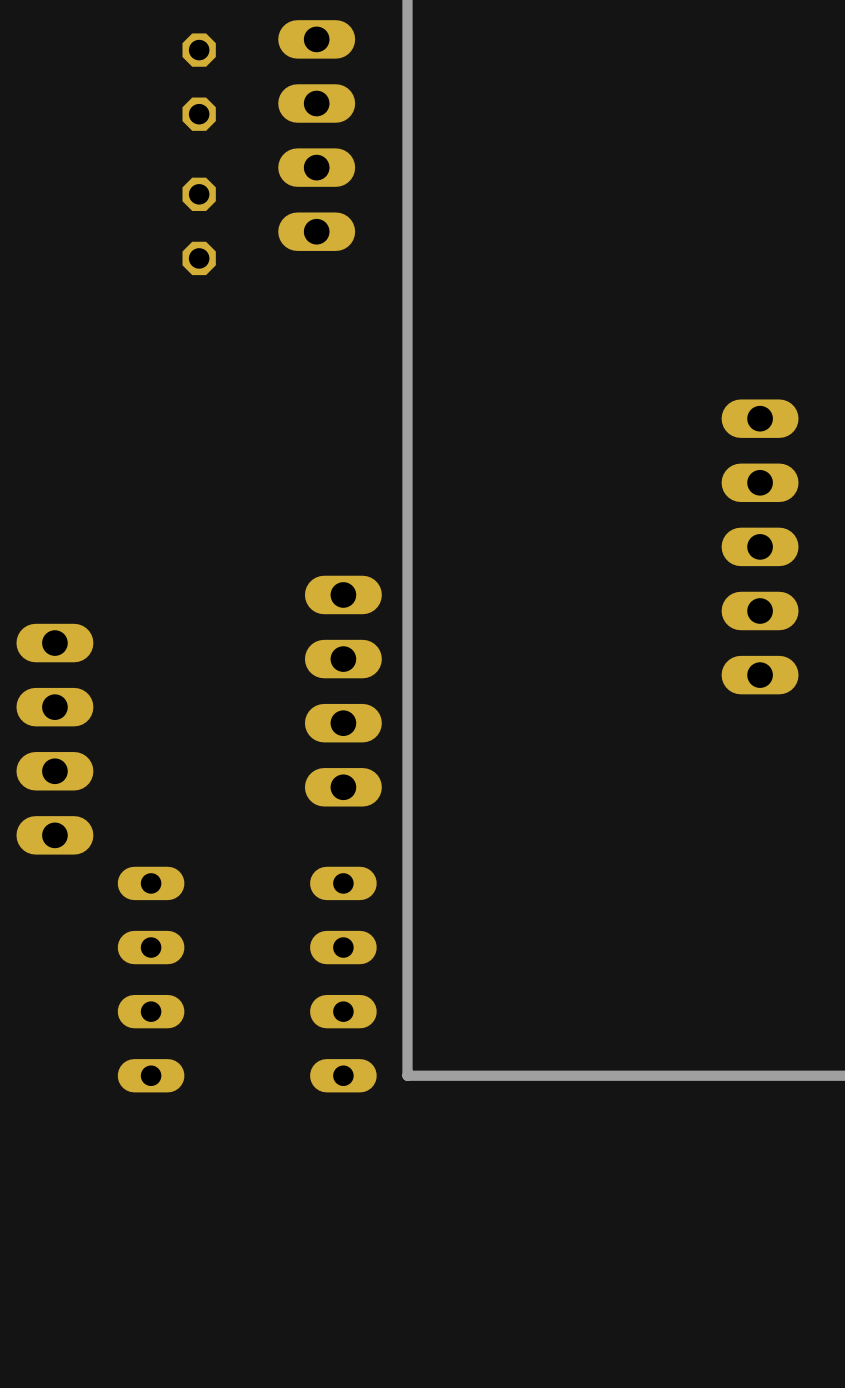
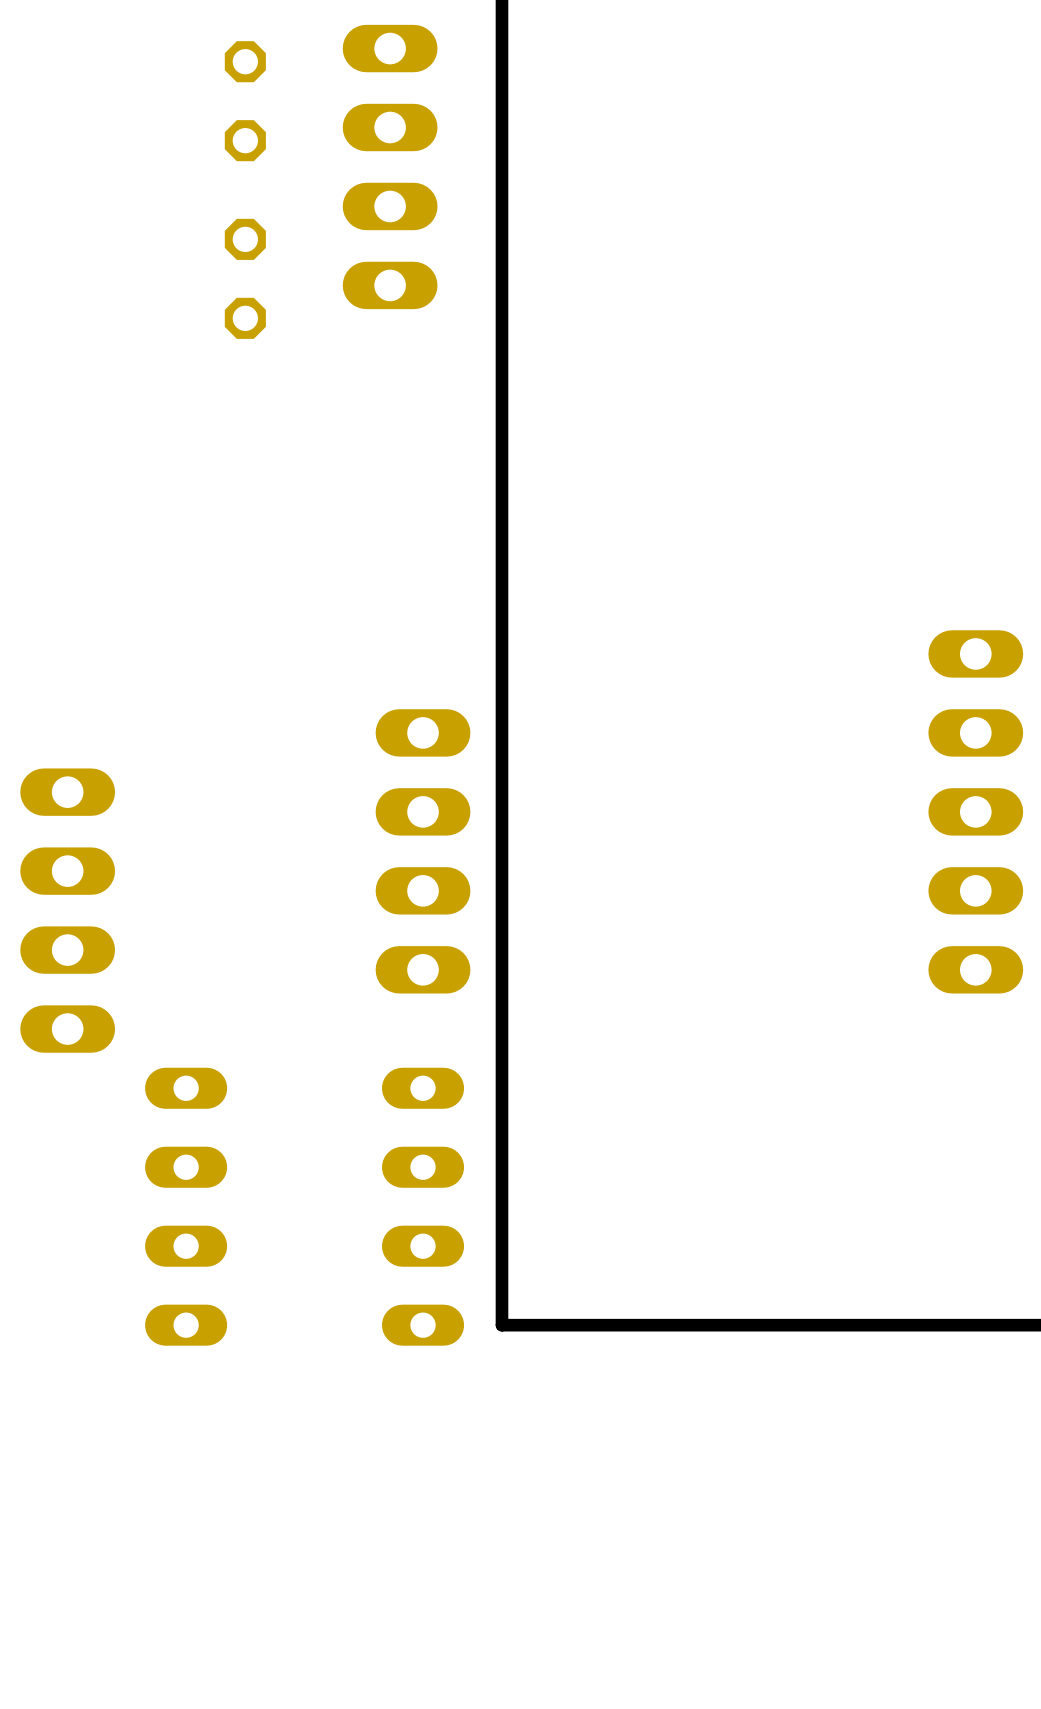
part position: (760, 546) -> (975, 811)

